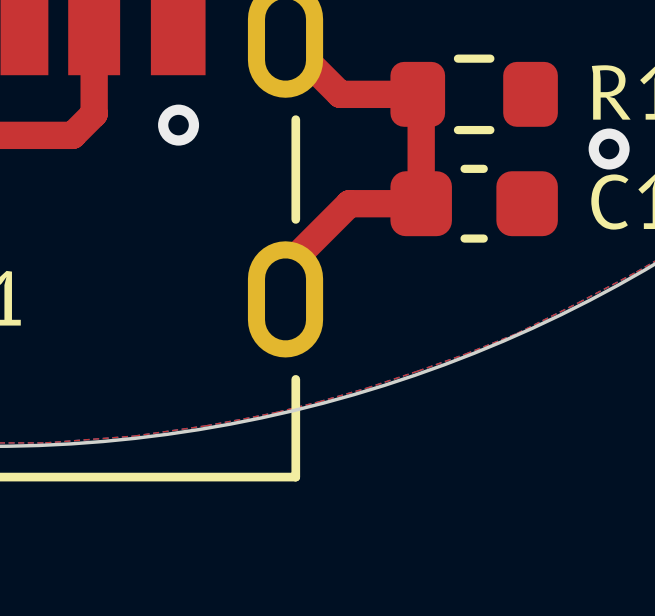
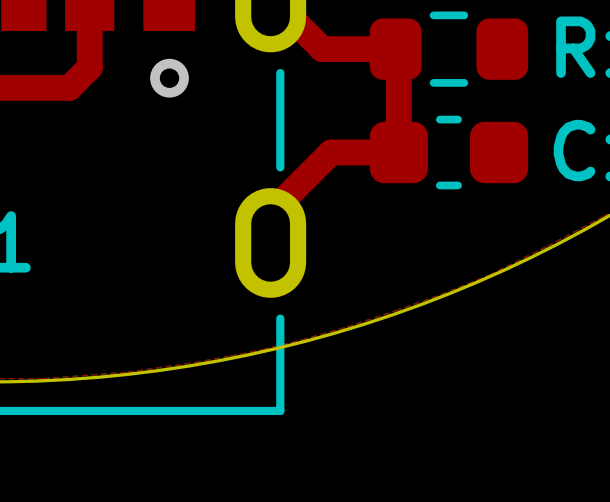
via: (609, 149) -> none

